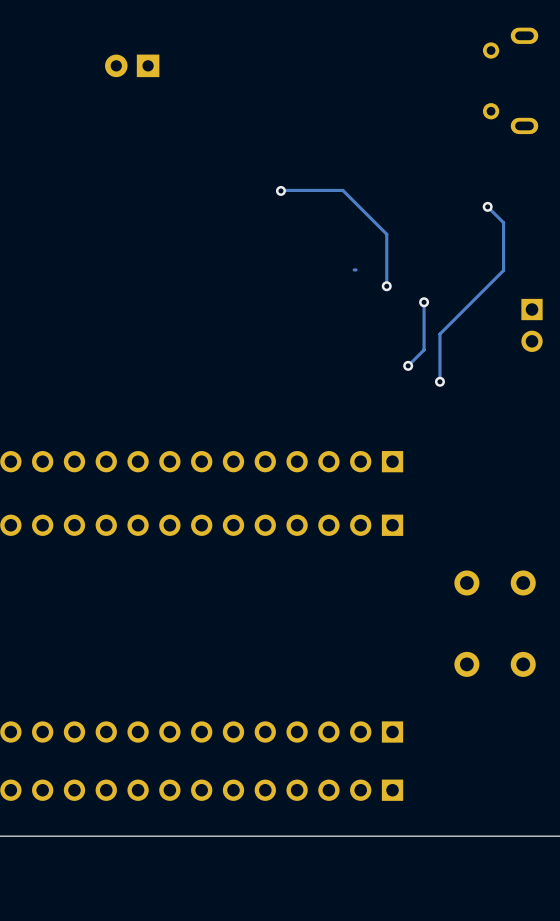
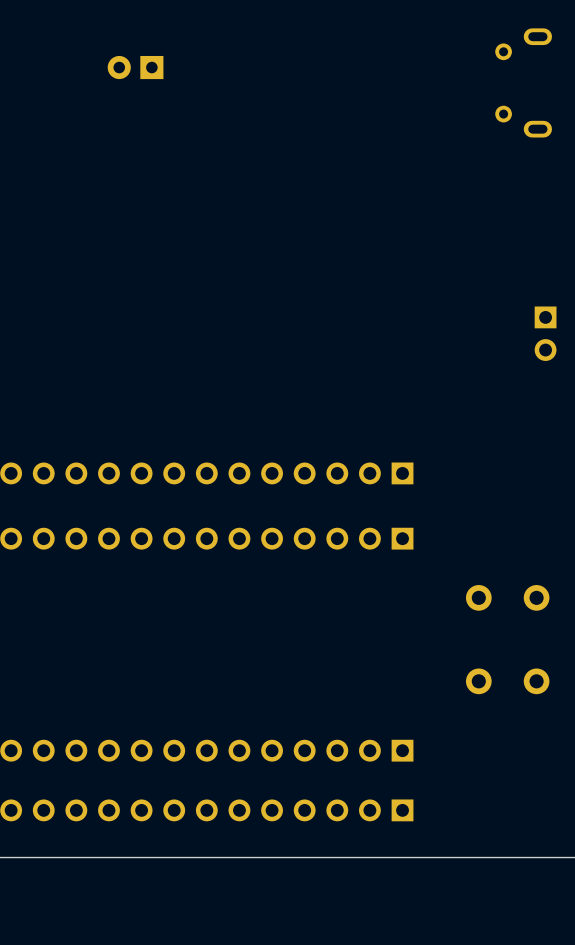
track: (280, 190) (342, 190) (386, 234) (386, 286) -> none
via: (280, 190) -> none
track: (487, 206) (503, 222) (503, 270) (439, 334) (439, 381) -> none
via: (487, 206) -> none
track: (356, 269) (354, 269) -> none
via: (386, 286) -> none
track: (424, 302) (424, 349) (408, 365) -> none
via: (424, 302) -> none
via: (408, 365) -> none
via: (439, 381) -> none

